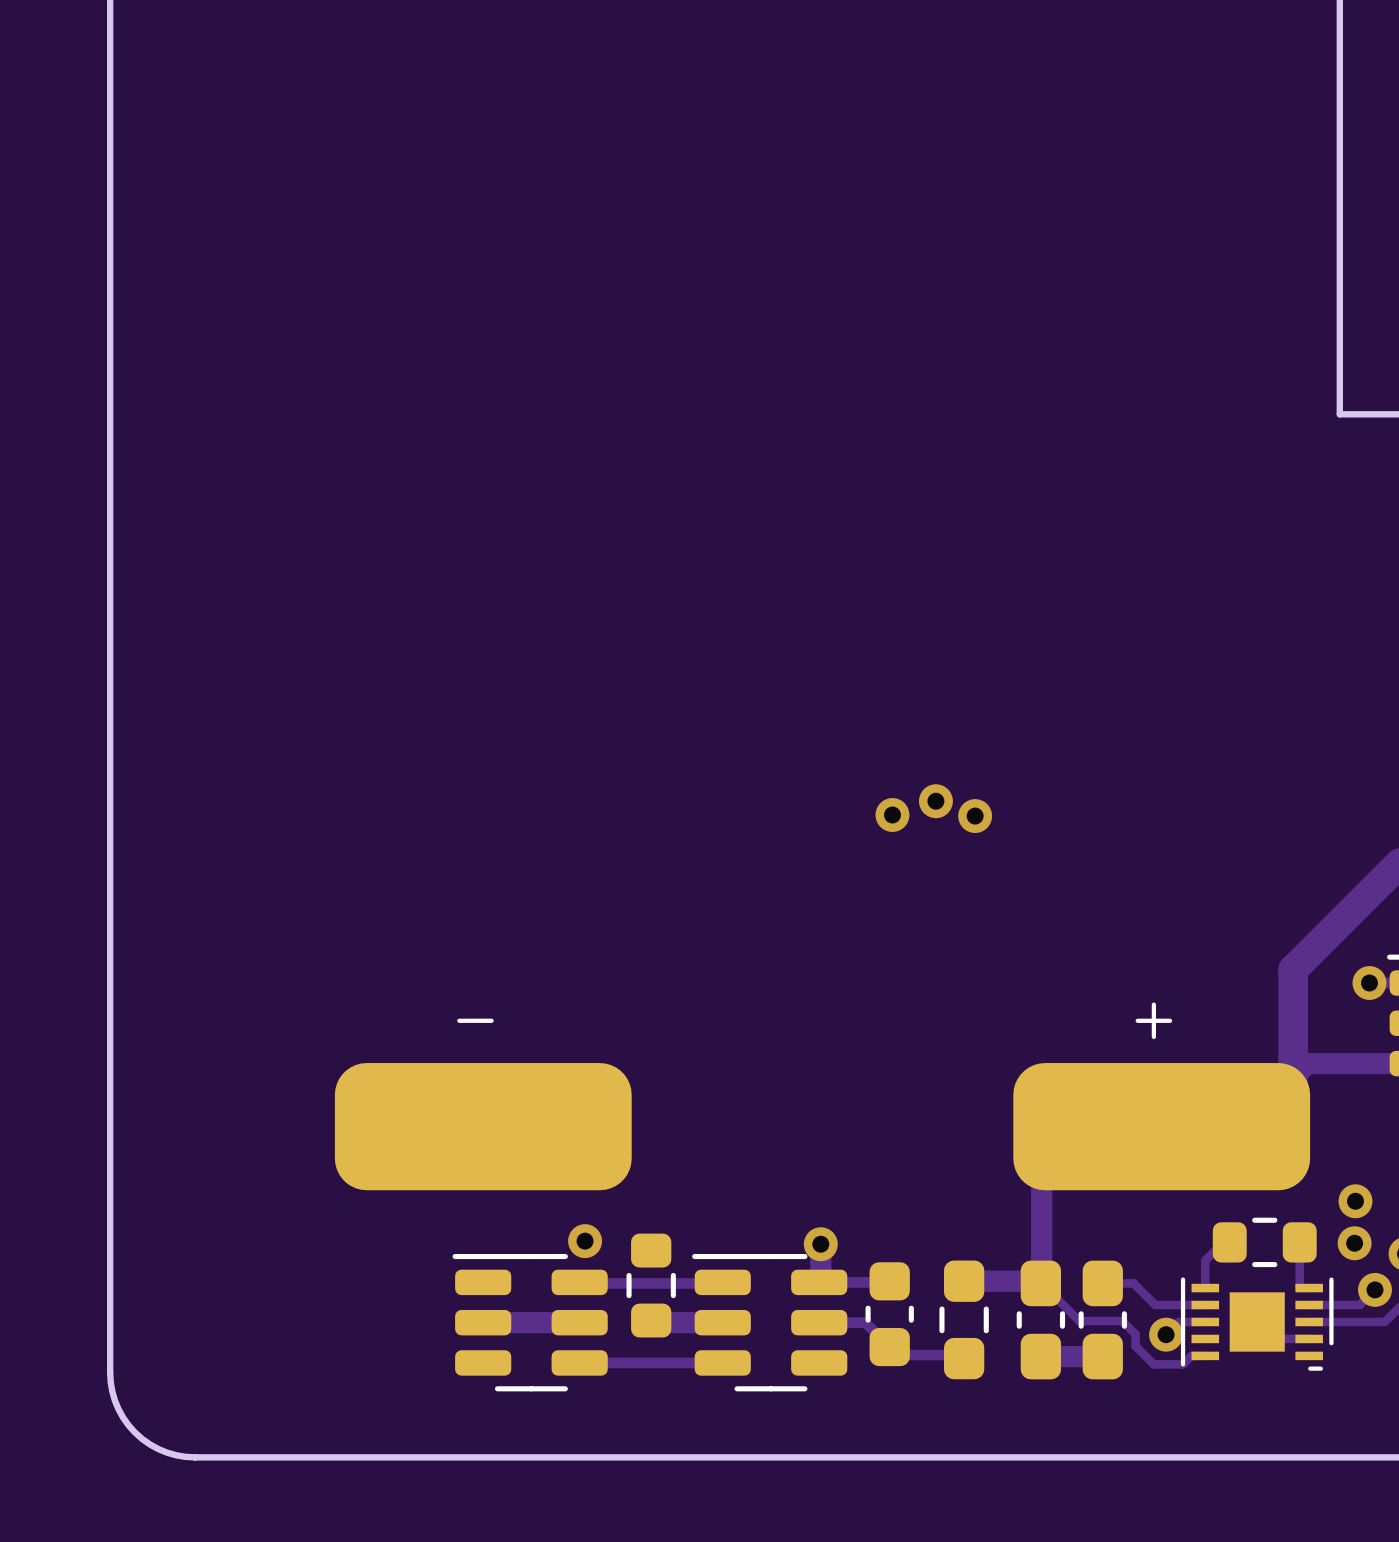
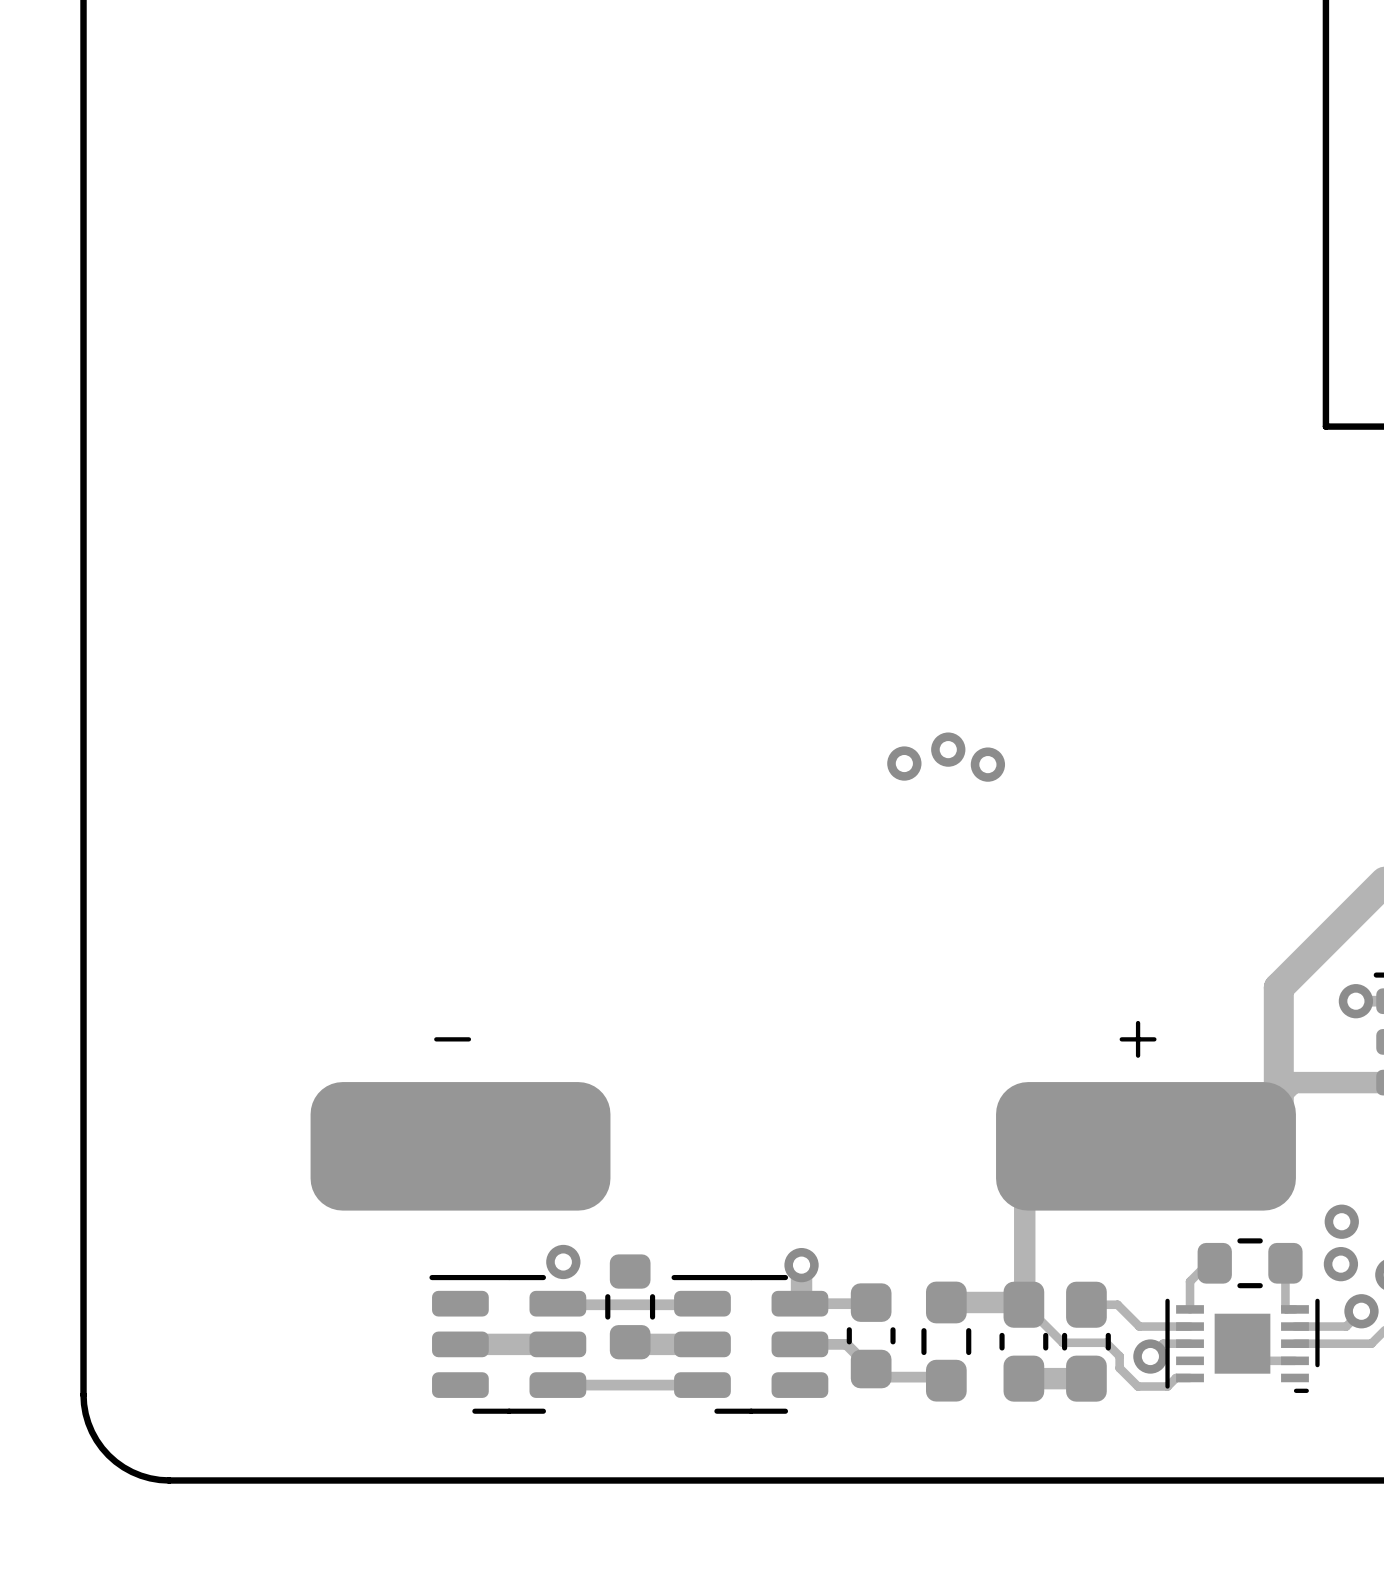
via: none -> (948, 749)
via: none -> (904, 763)
via: none -> (987, 764)
via: (935, 801) -> none
via: (892, 815) -> none
via: (975, 816) -> none

